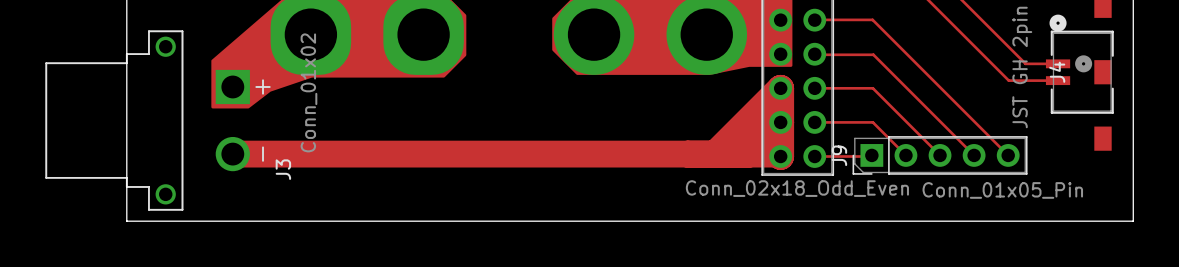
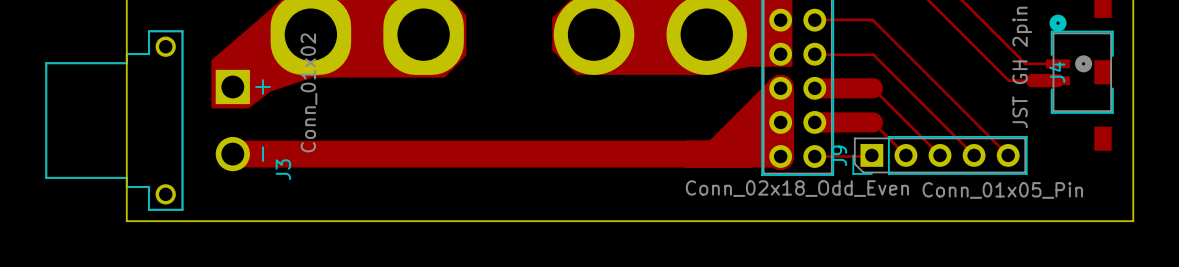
track width: thin (1032, 80) (1058, 80) -> thick (1032, 80) (1058, 80)
track width: thin (814, 88) (872, 88) -> thick (814, 88) (872, 88)
track width: thin (814, 122) (872, 122) -> thick (814, 122) (872, 122)

